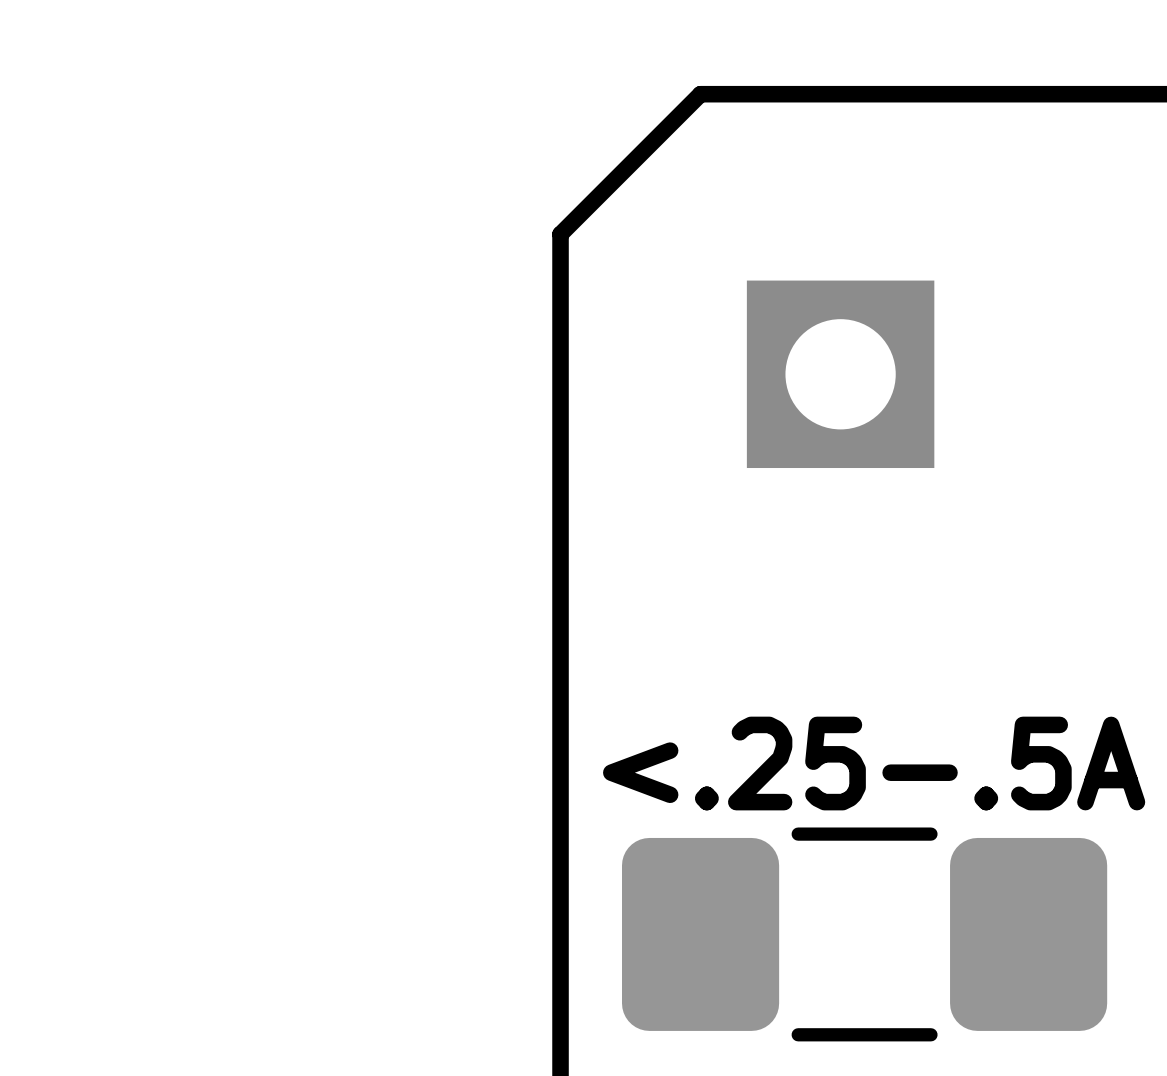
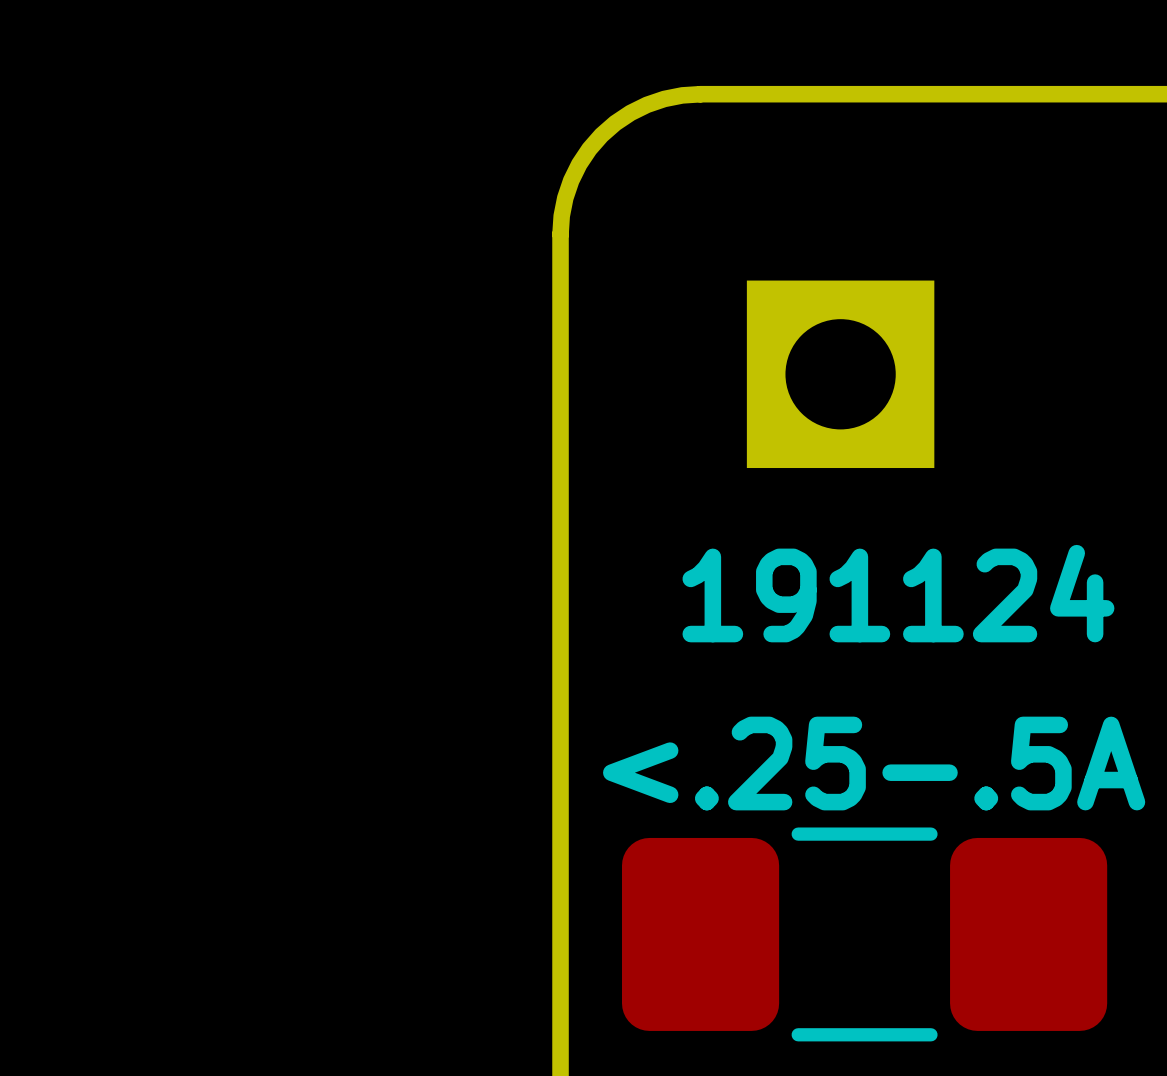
board edge: (700, 94) (560, 234) -> (700, 94) (682, 95) (646, 104) (630, 112) (601, 135) (579, 164) (571, 180) (561, 215) (560, 234)
text: none -> 191124 (898, 593)

